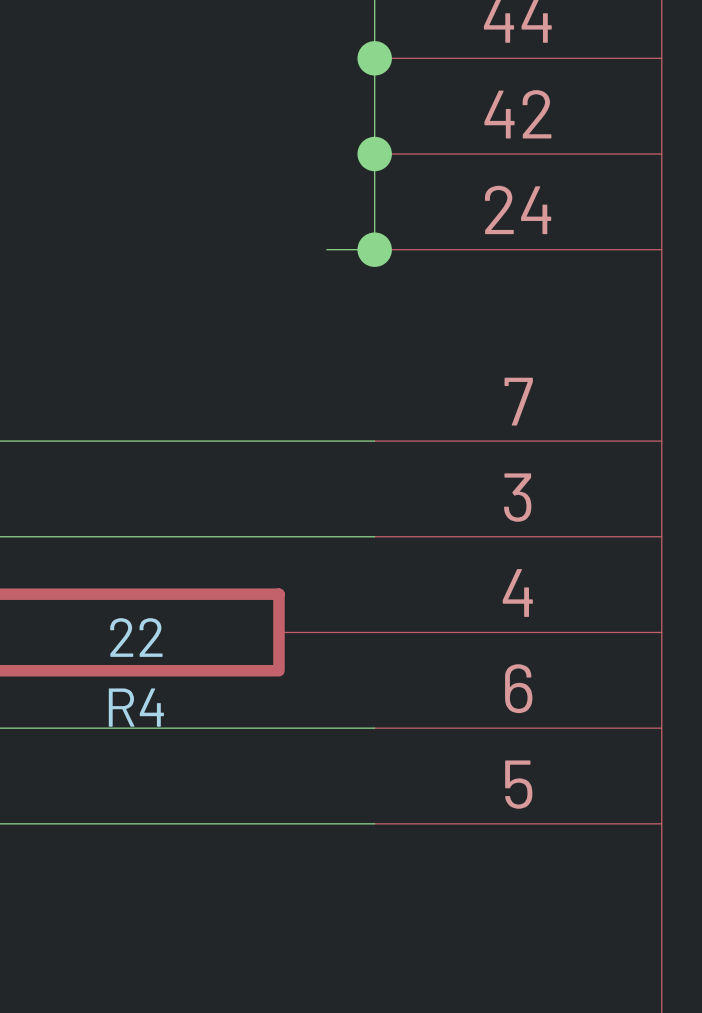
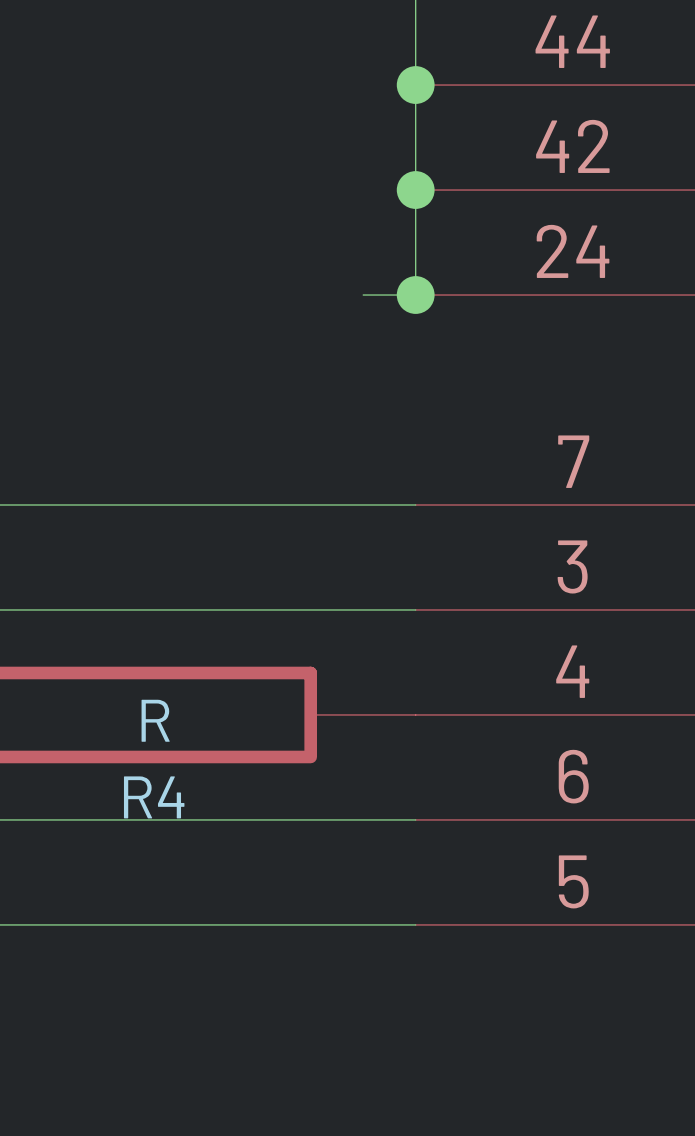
R4 value: 22 (136, 637) -> R (155, 720)

